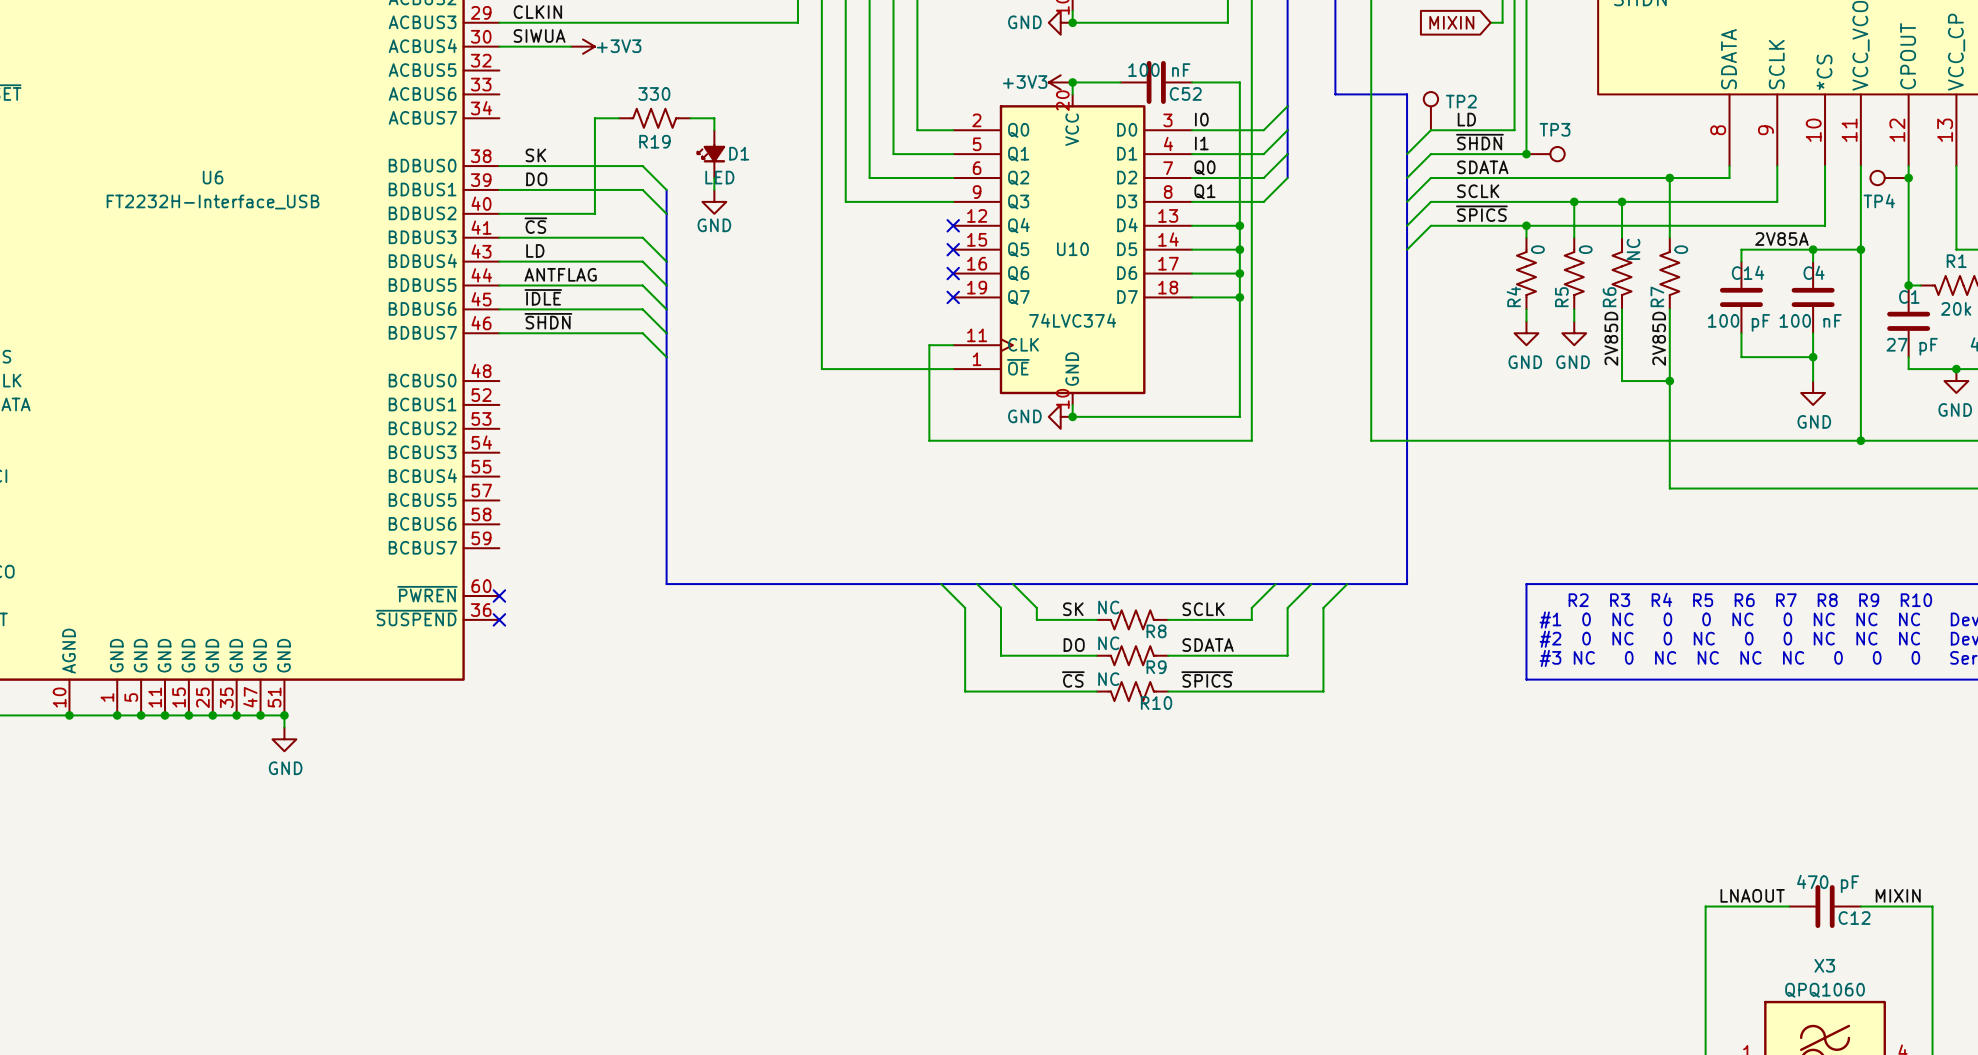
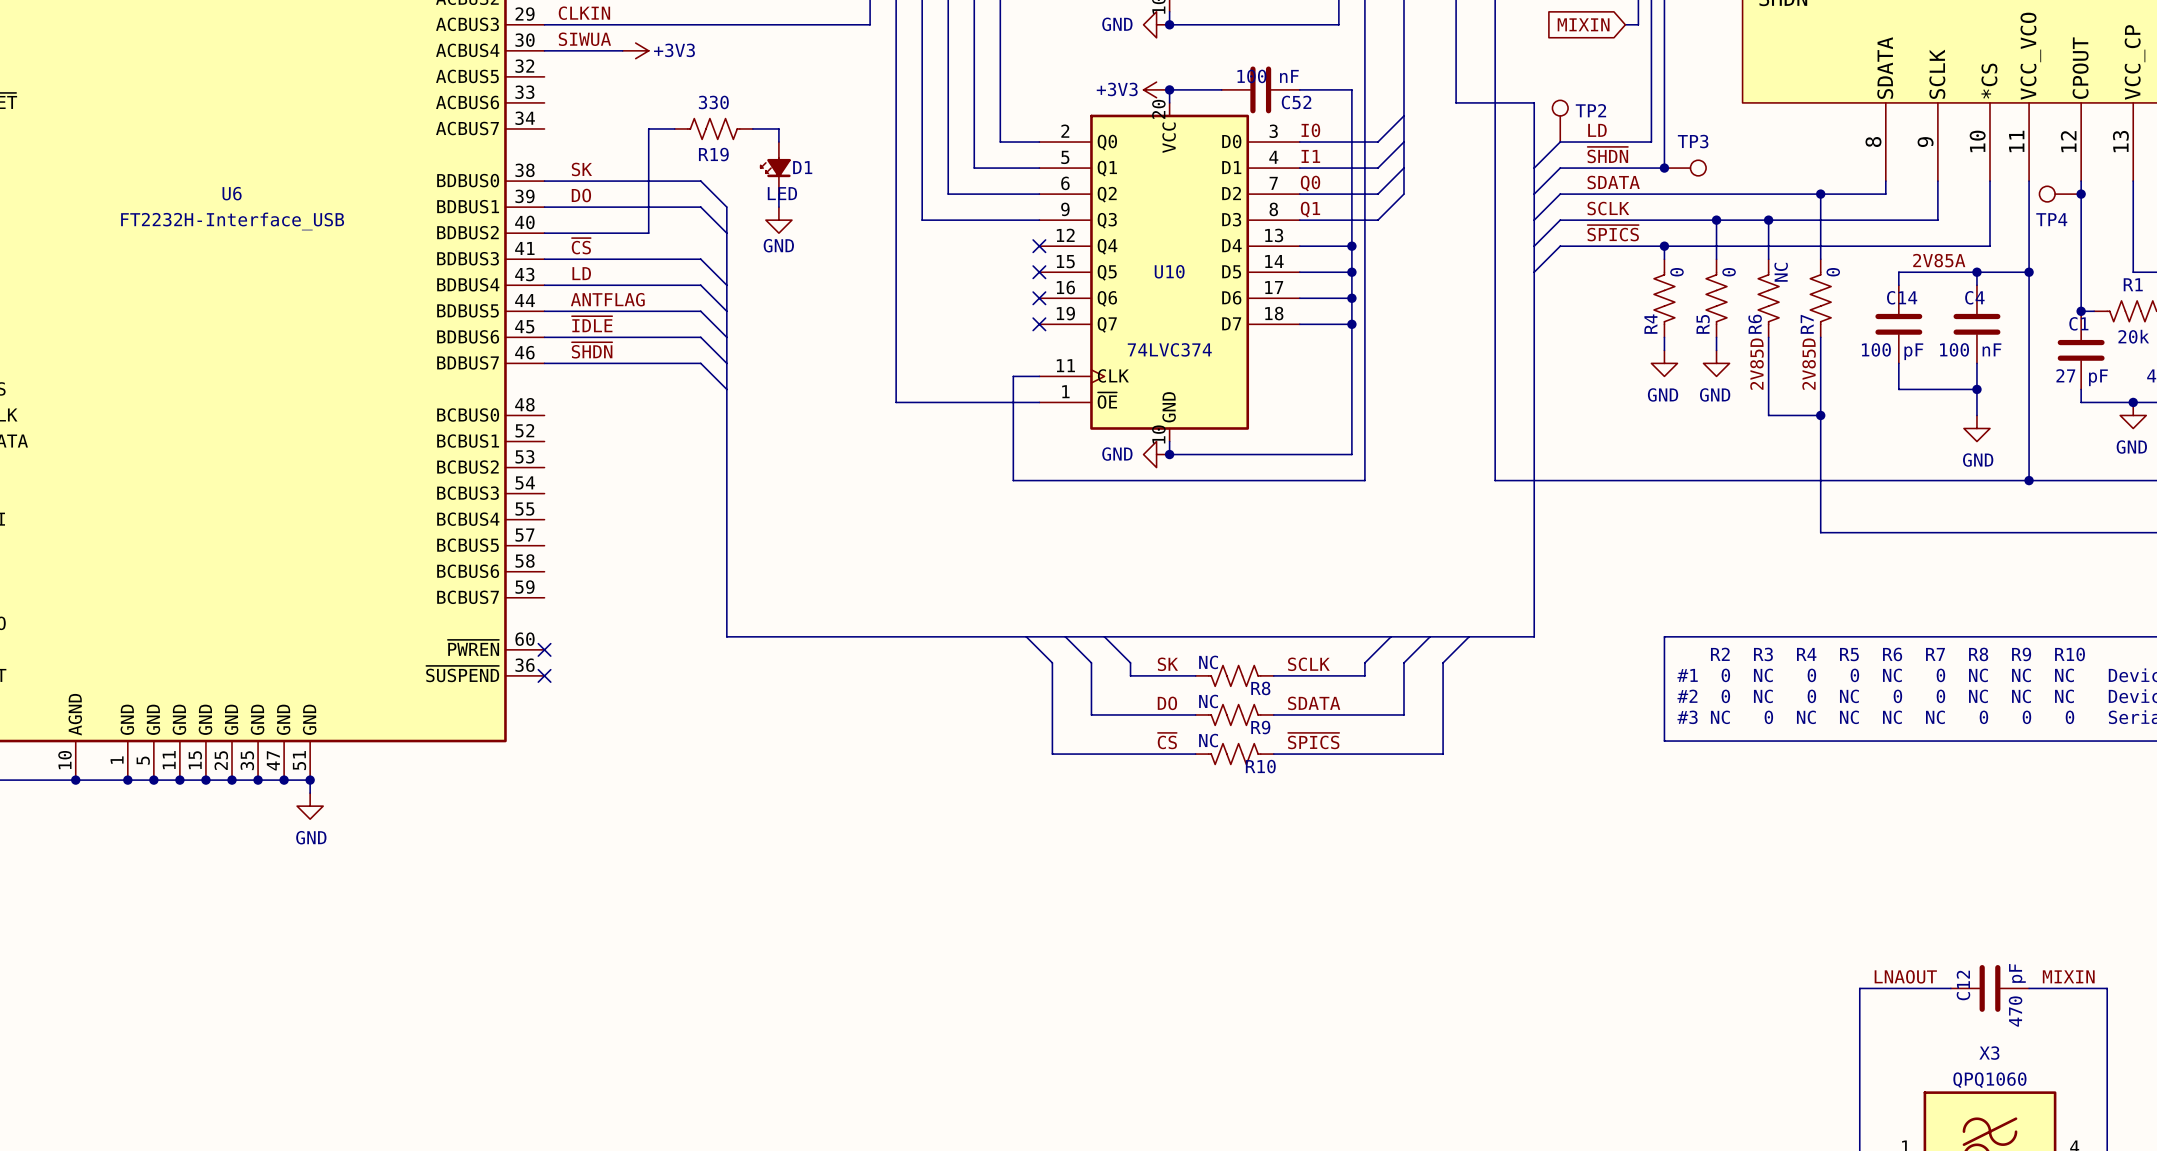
C12 value rotation: 0° (1828, 883) -> 90° counterclockwise (2017, 995)
C12 name rotation: 0° (1854, 918) -> 90° counterclockwise (1963, 985)
C12 name position: C12 (1854, 918) -> C12 (1963, 985)

